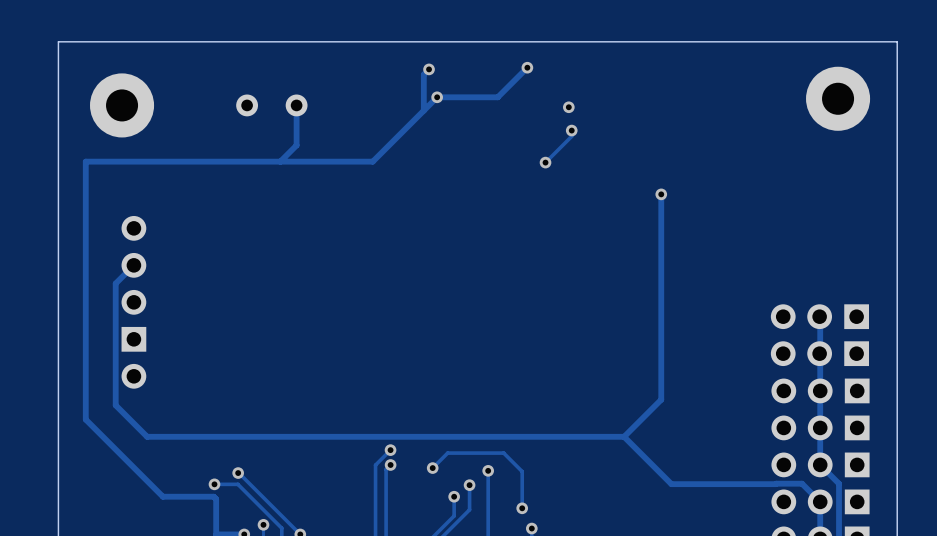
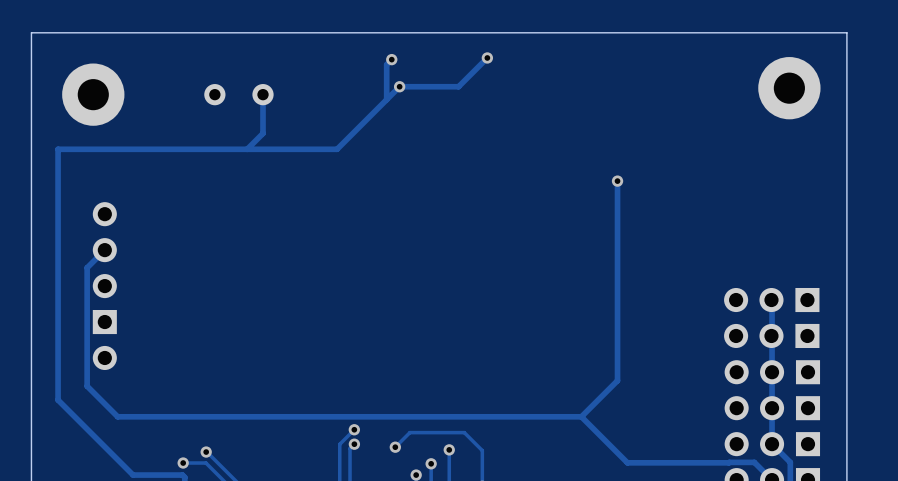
via: (568, 107) -> none
track: (571, 130) (571, 136) (545, 162) -> none
via: (571, 130) -> none
via: (545, 162) -> none

